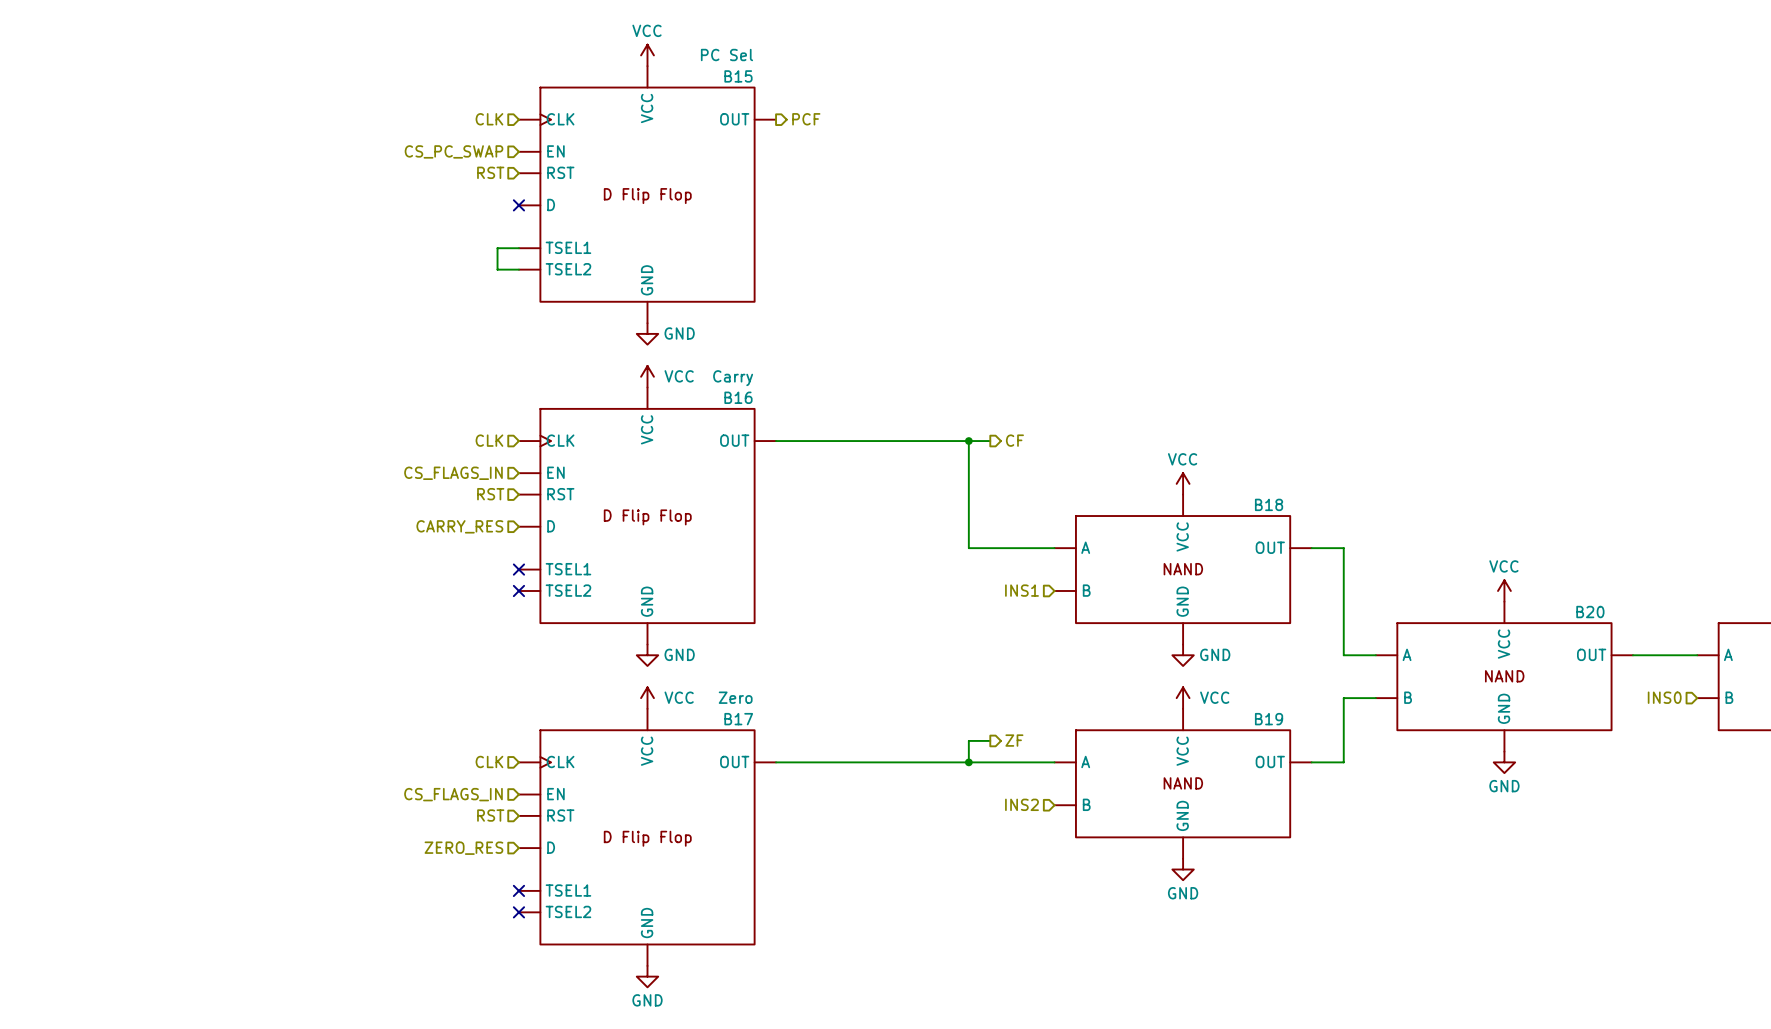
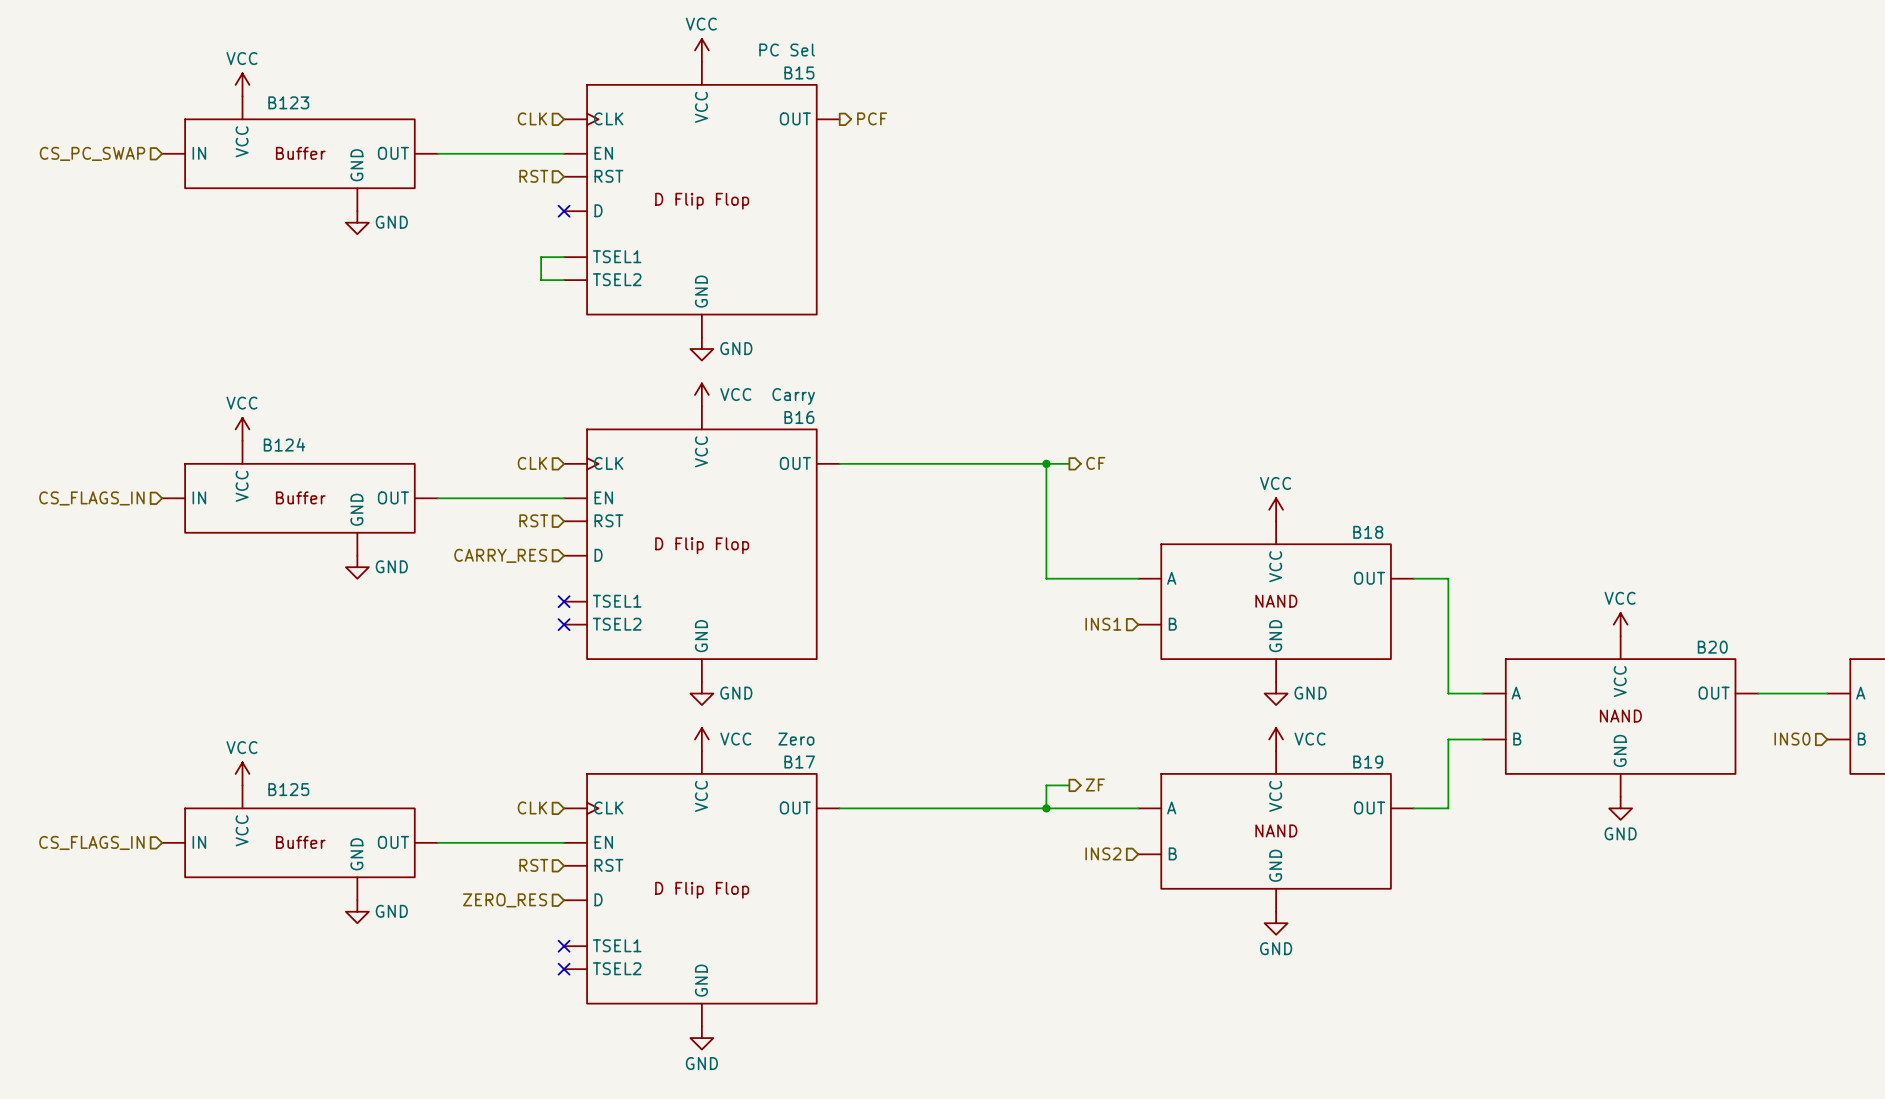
power symbol: none -> VCC (242, 84)
hierarchical label: none -> CS_PC_SWAP (92, 153)
B123: none -> (299, 153)
wire: none -> (437, 153) (564, 153)
hierarchical label: CS_PC_SWAP (454, 151) -> none
power symbol: none -> GND (357, 222)
power symbol: none -> VCC (242, 429)
hierarchical label: none -> CS_FLAGS_IN (91, 498)
B124: none -> (299, 498)
wire: none -> (437, 498) (564, 498)
hierarchical label: CS_FLAGS_IN (453, 473) -> none
power symbol: none -> GND (357, 567)
power symbol: none -> VCC (242, 773)
hierarchical label: none -> CS_FLAGS_IN (91, 842)
B125: none -> (299, 842)
wire: none -> (437, 842) (564, 842)
hierarchical label: CS_FLAGS_IN (453, 794) -> none
power symbol: none -> GND (357, 911)

